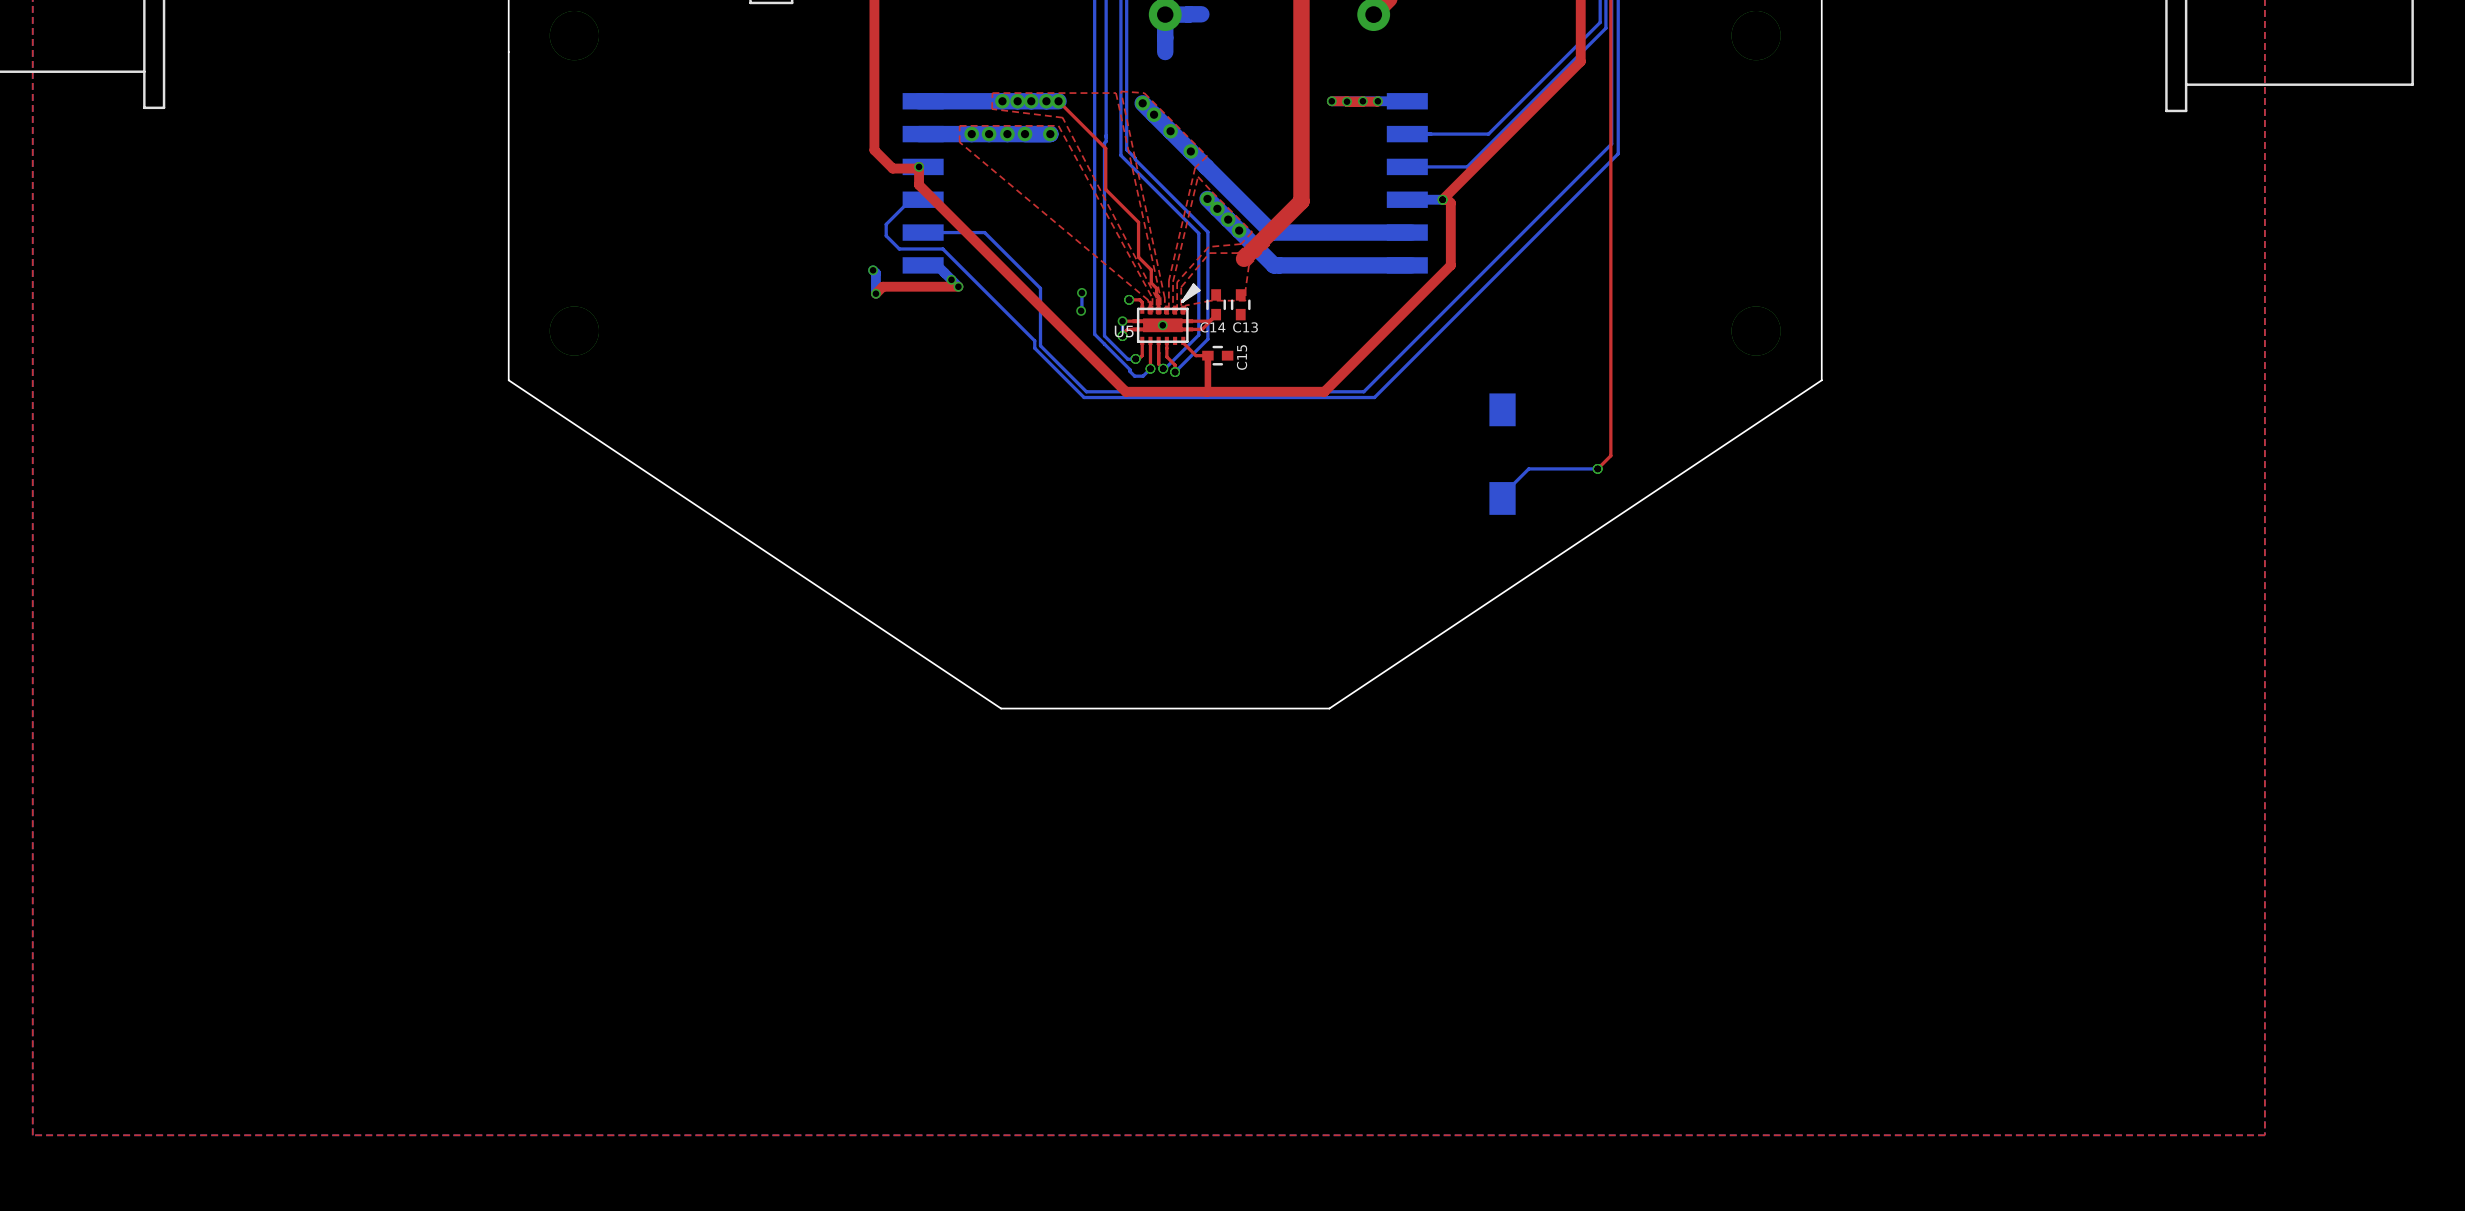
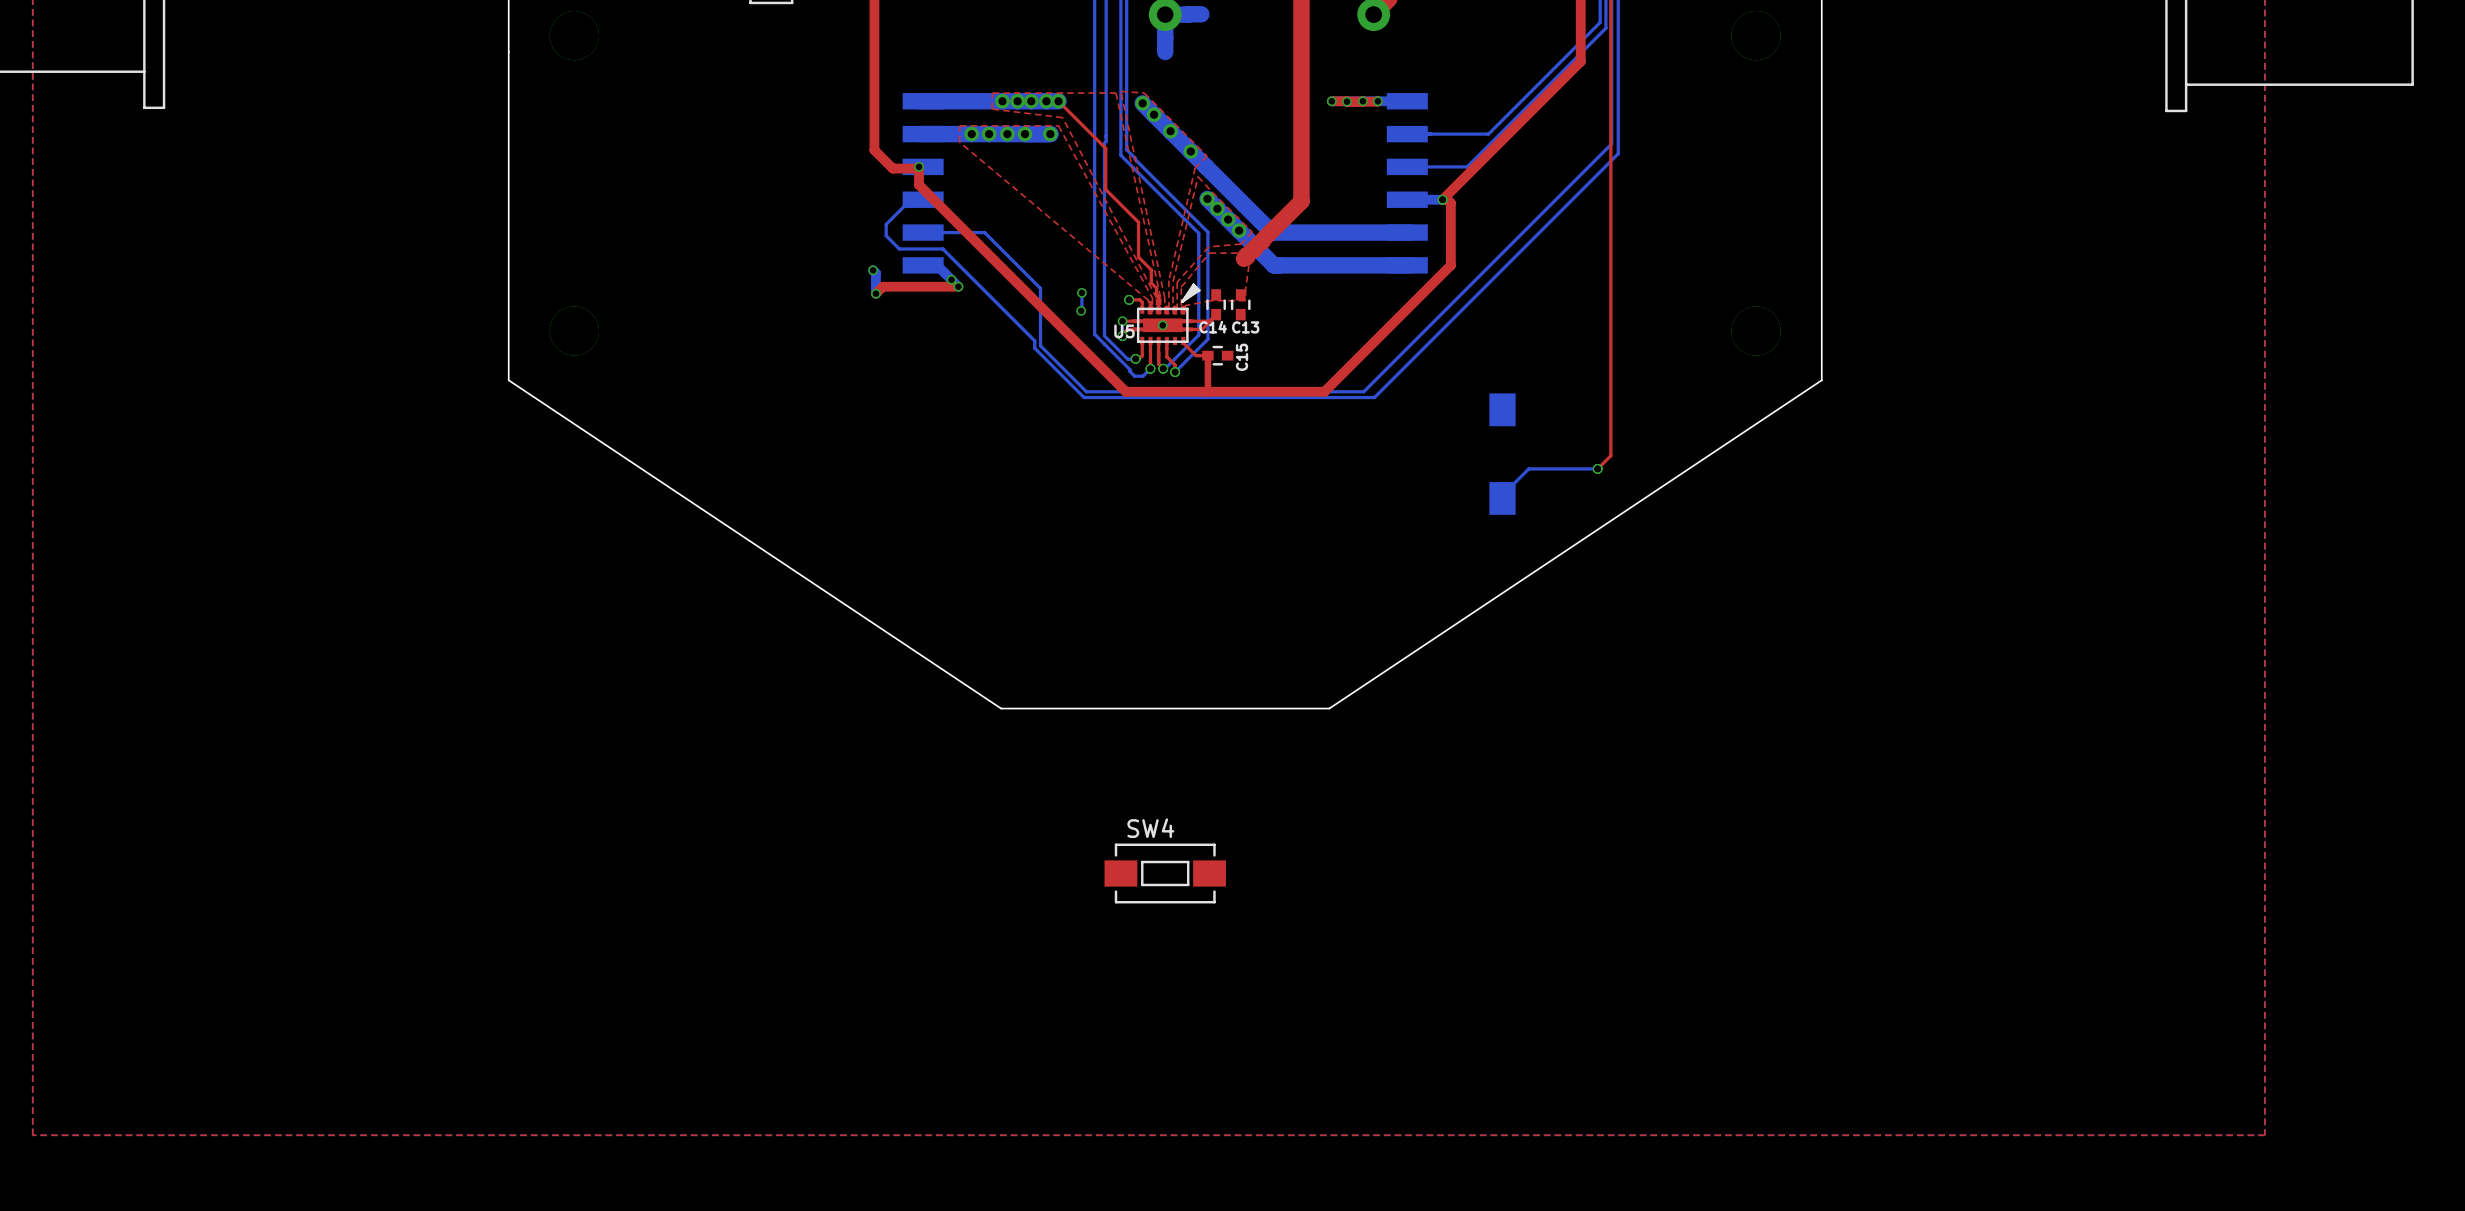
SW4: none -> (1165, 873)

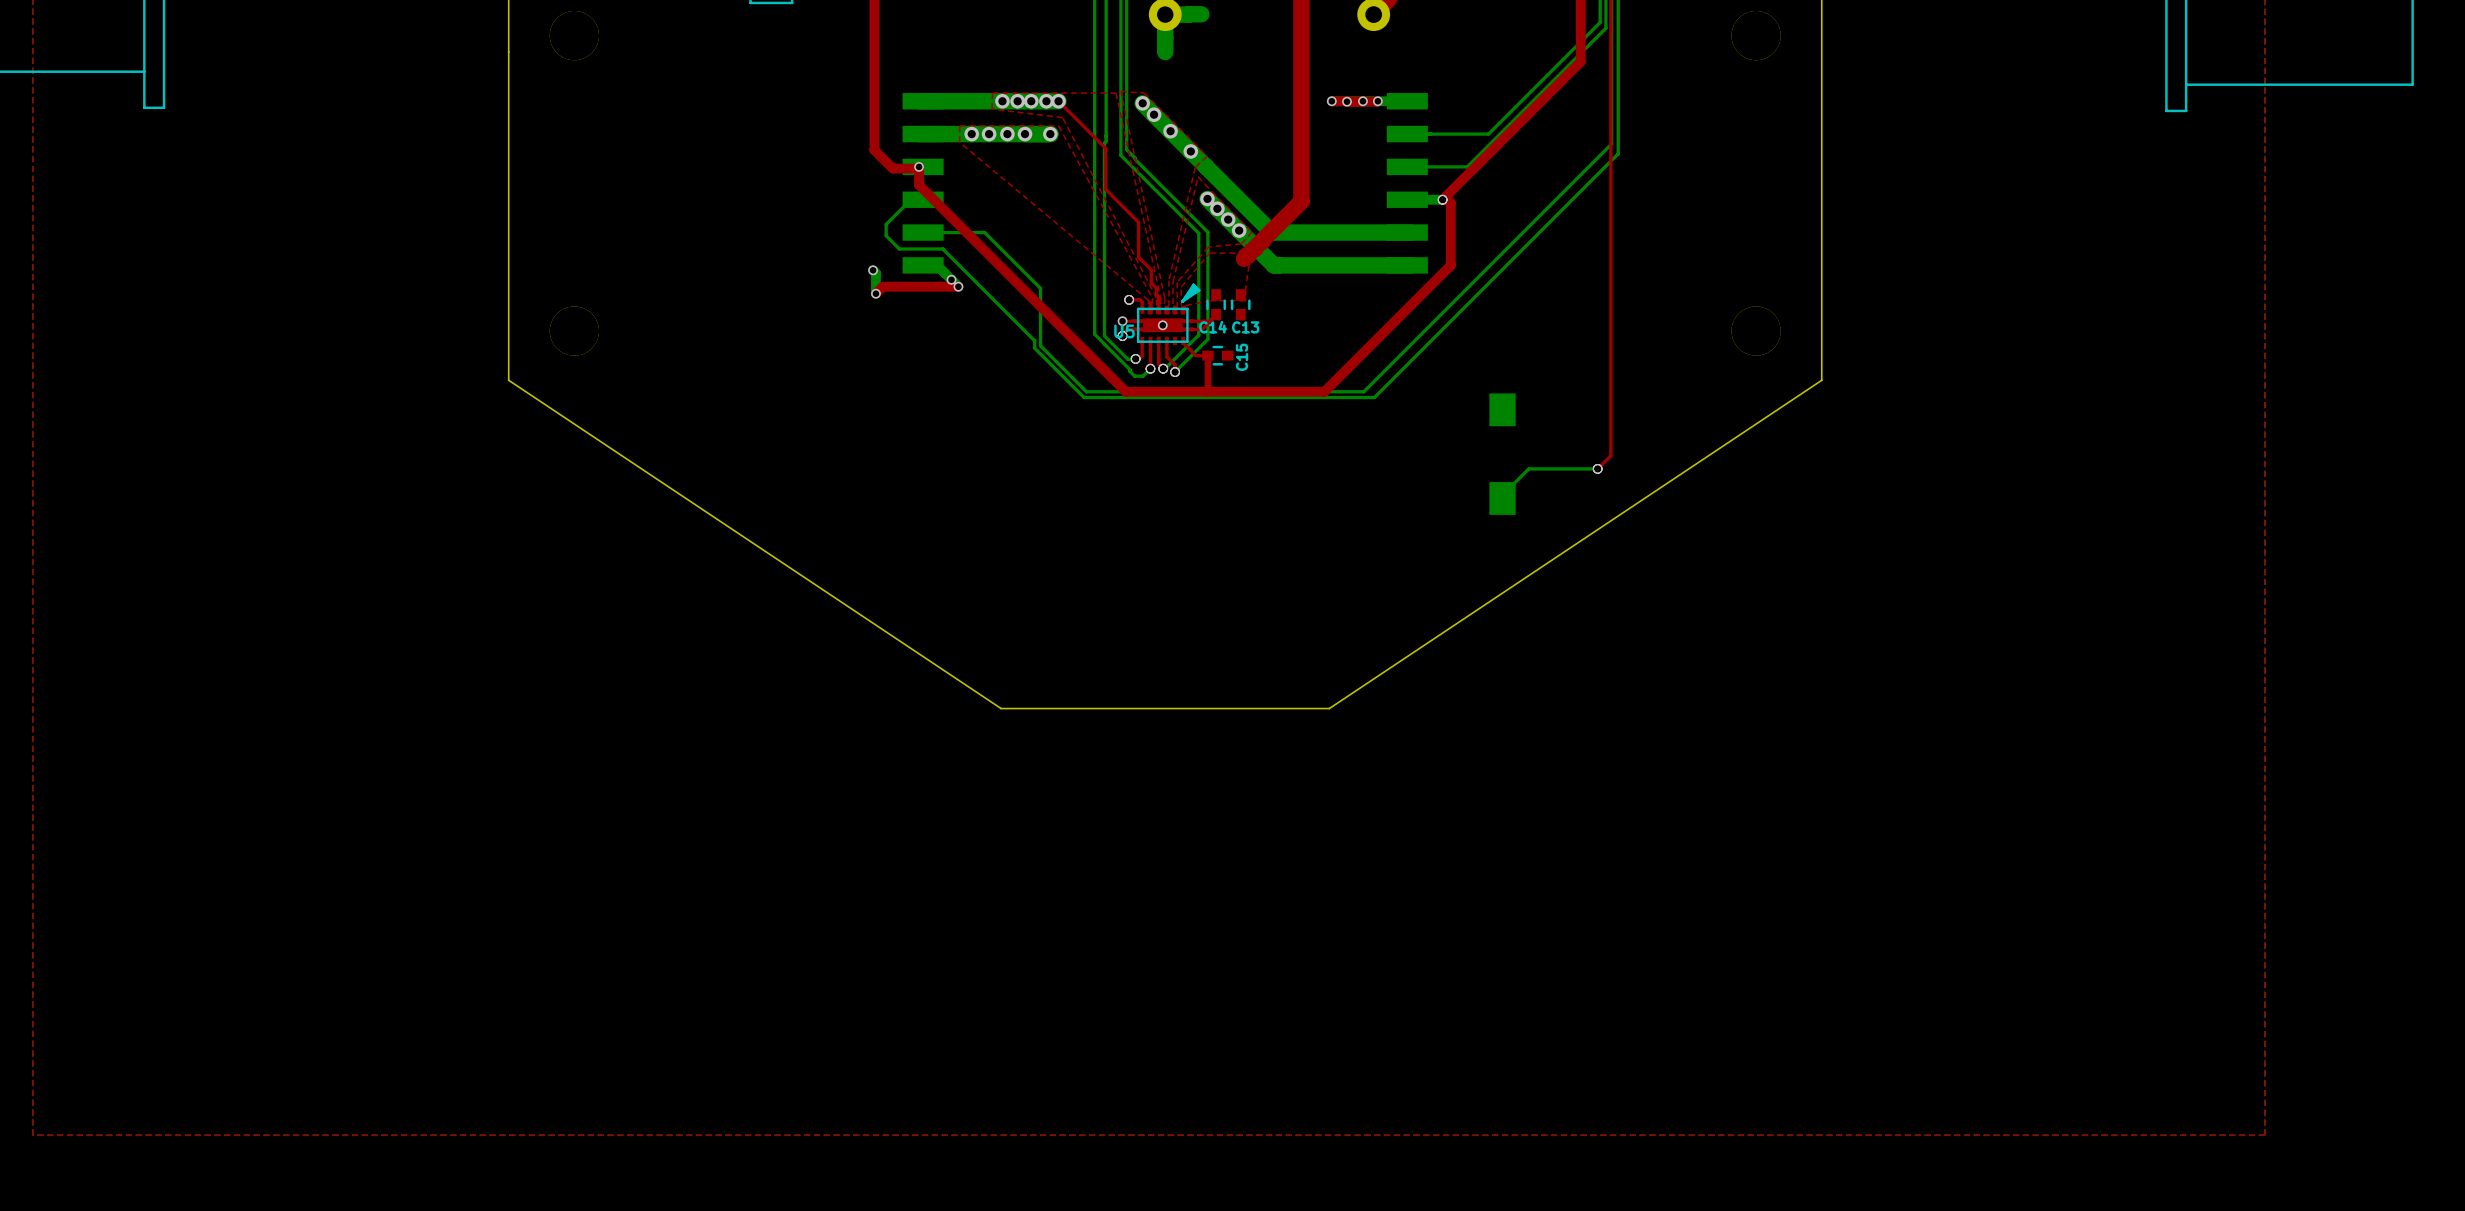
bottom track: (1081, 292) (1081, 310) -> none
via: (1081, 292) -> none
via: (1081, 310) -> none
SW4: (1165, 873) -> none

